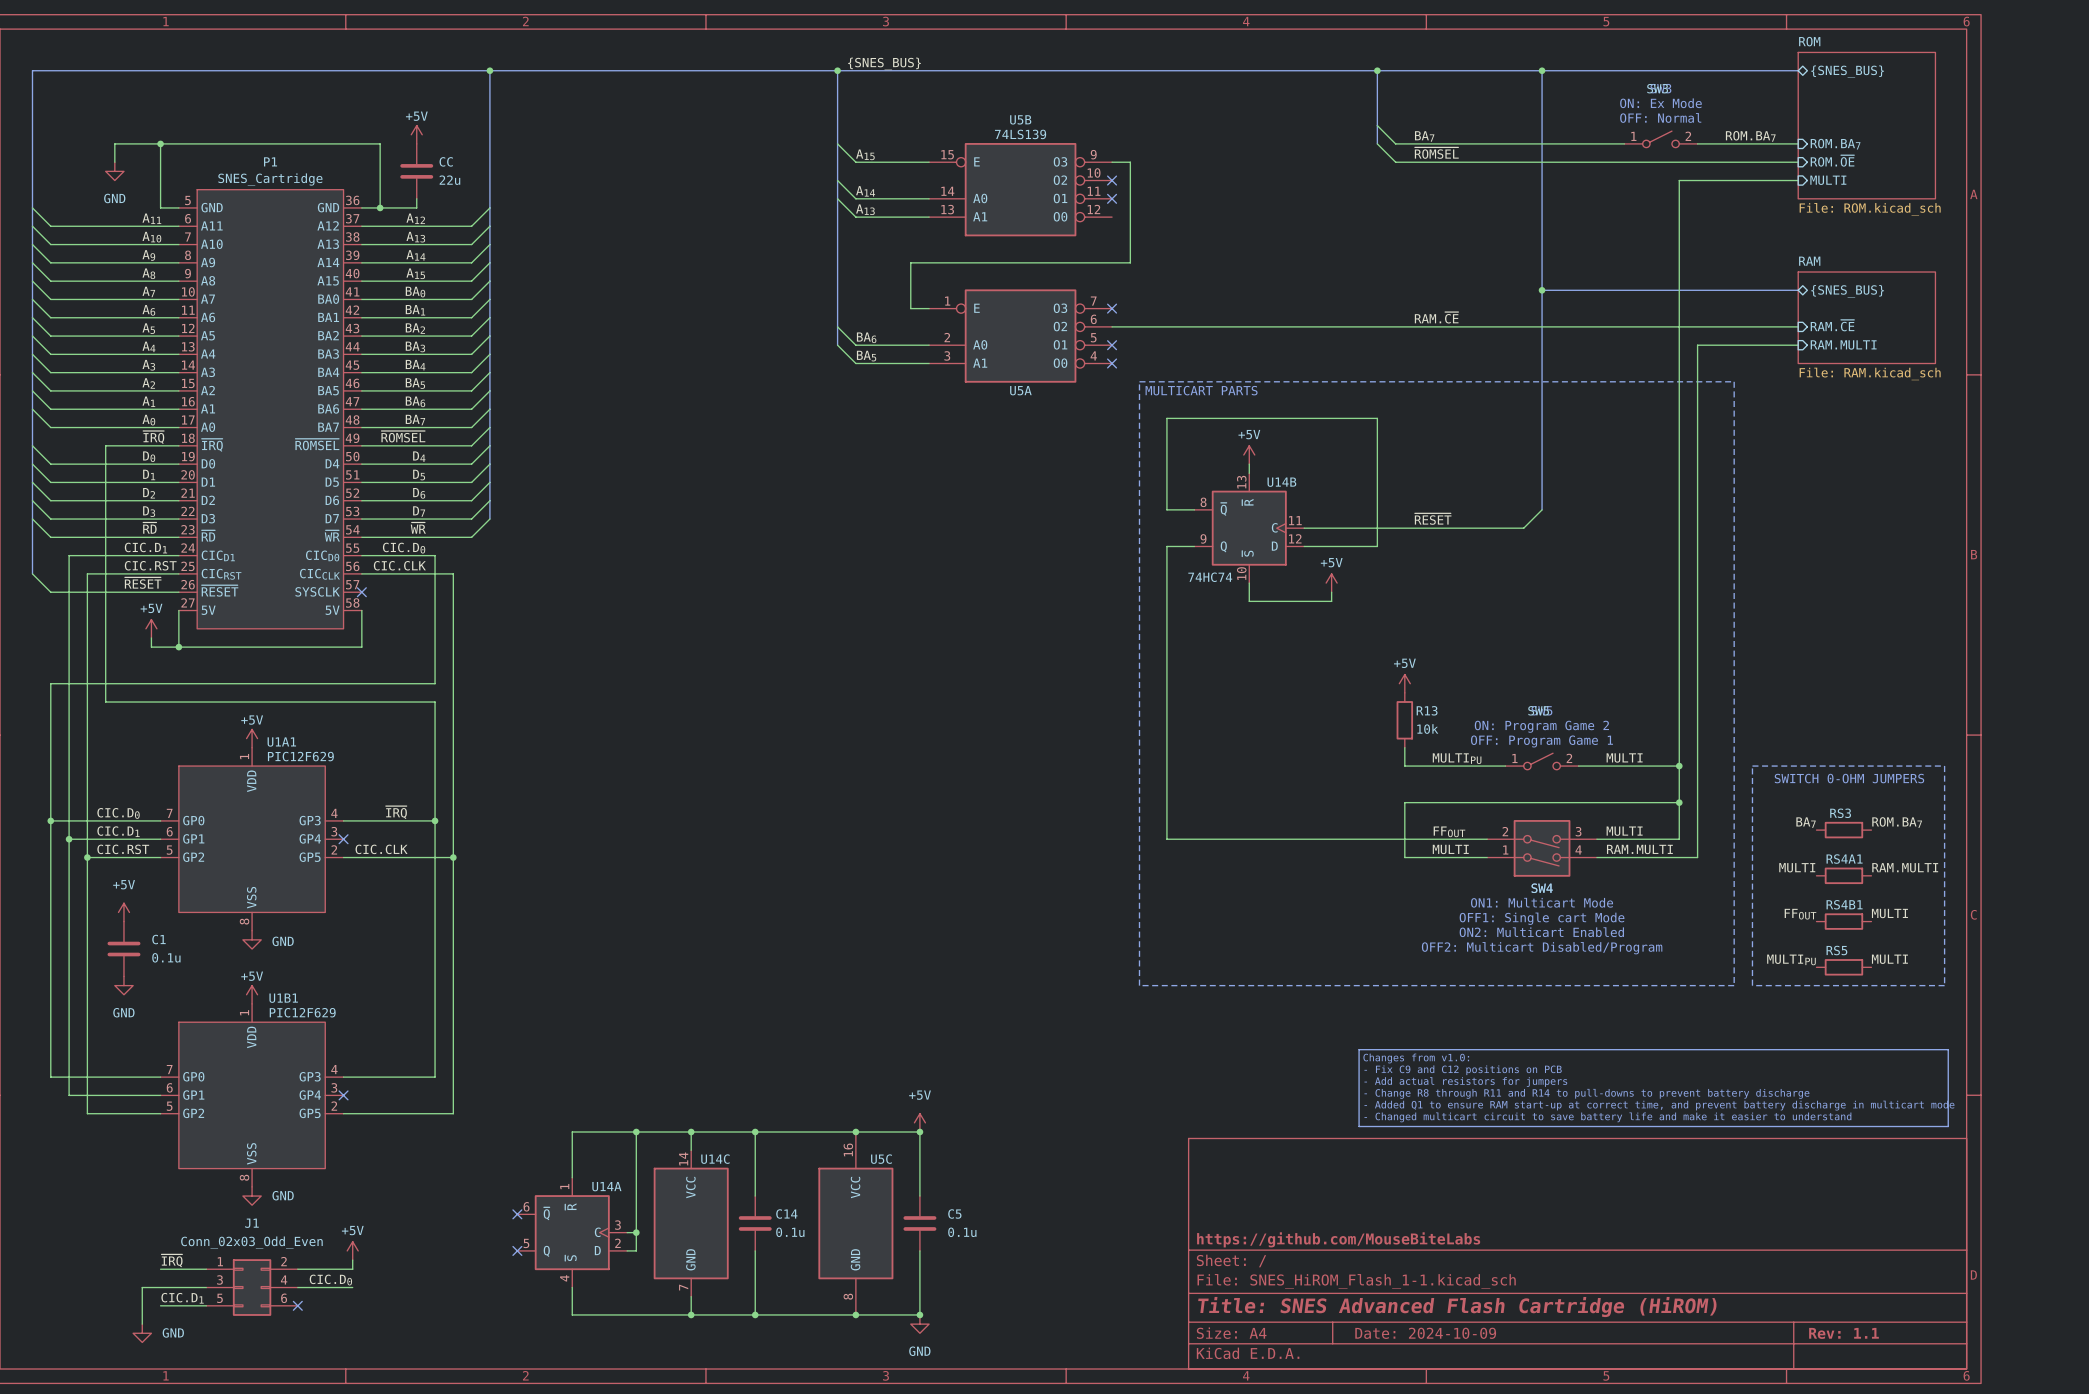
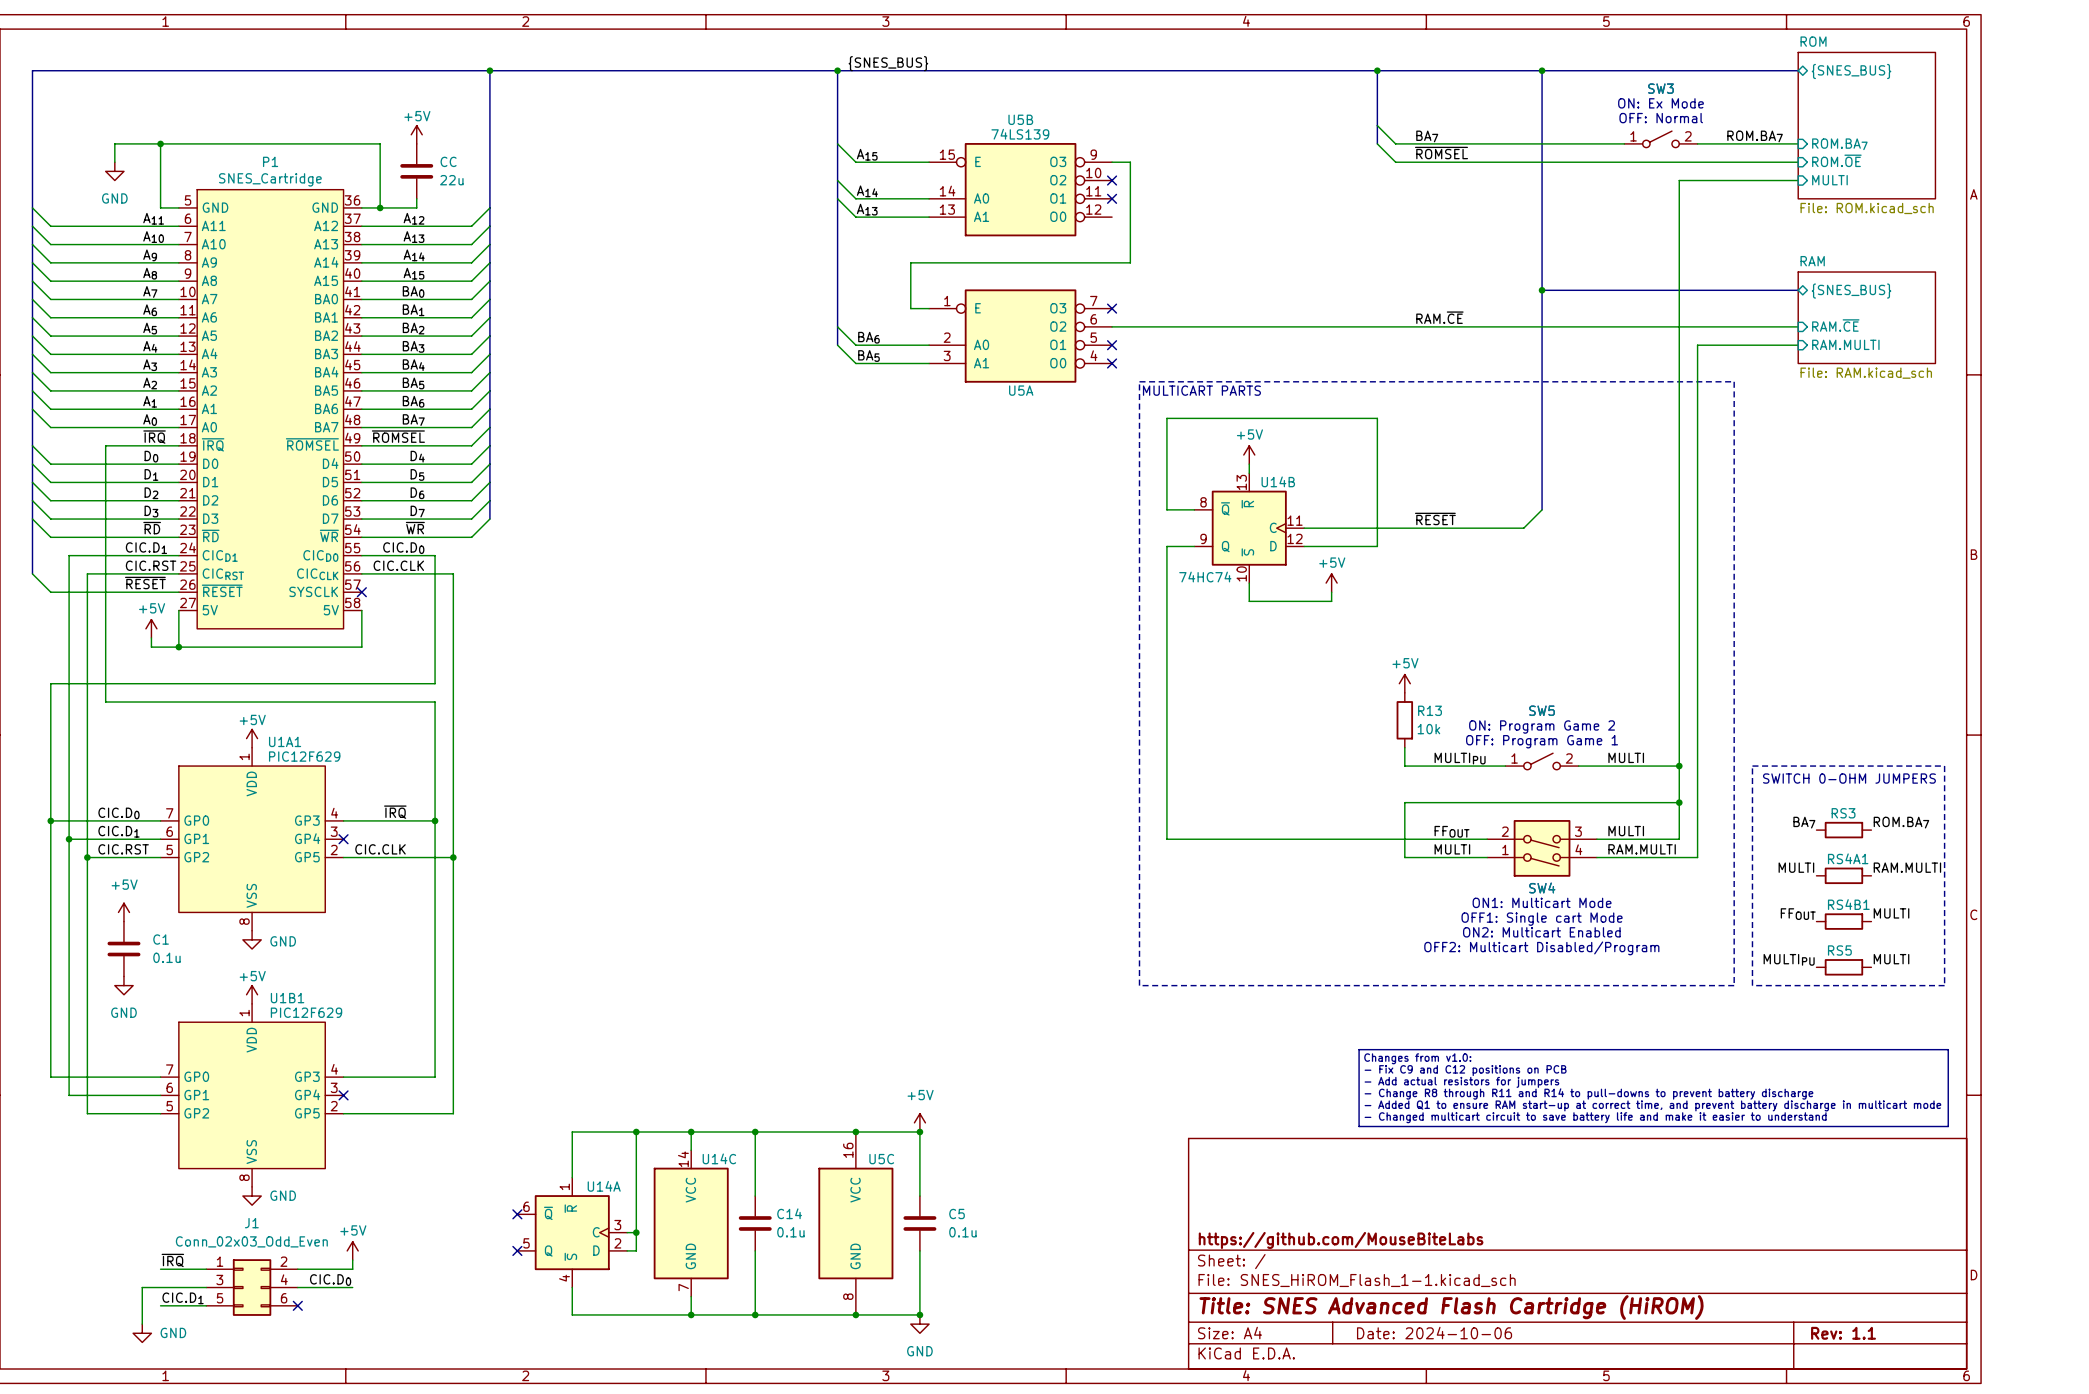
title block: Date: 2024-10-09 (1425, 1333) -> Date: 2024-10-06 (1434, 1333)

